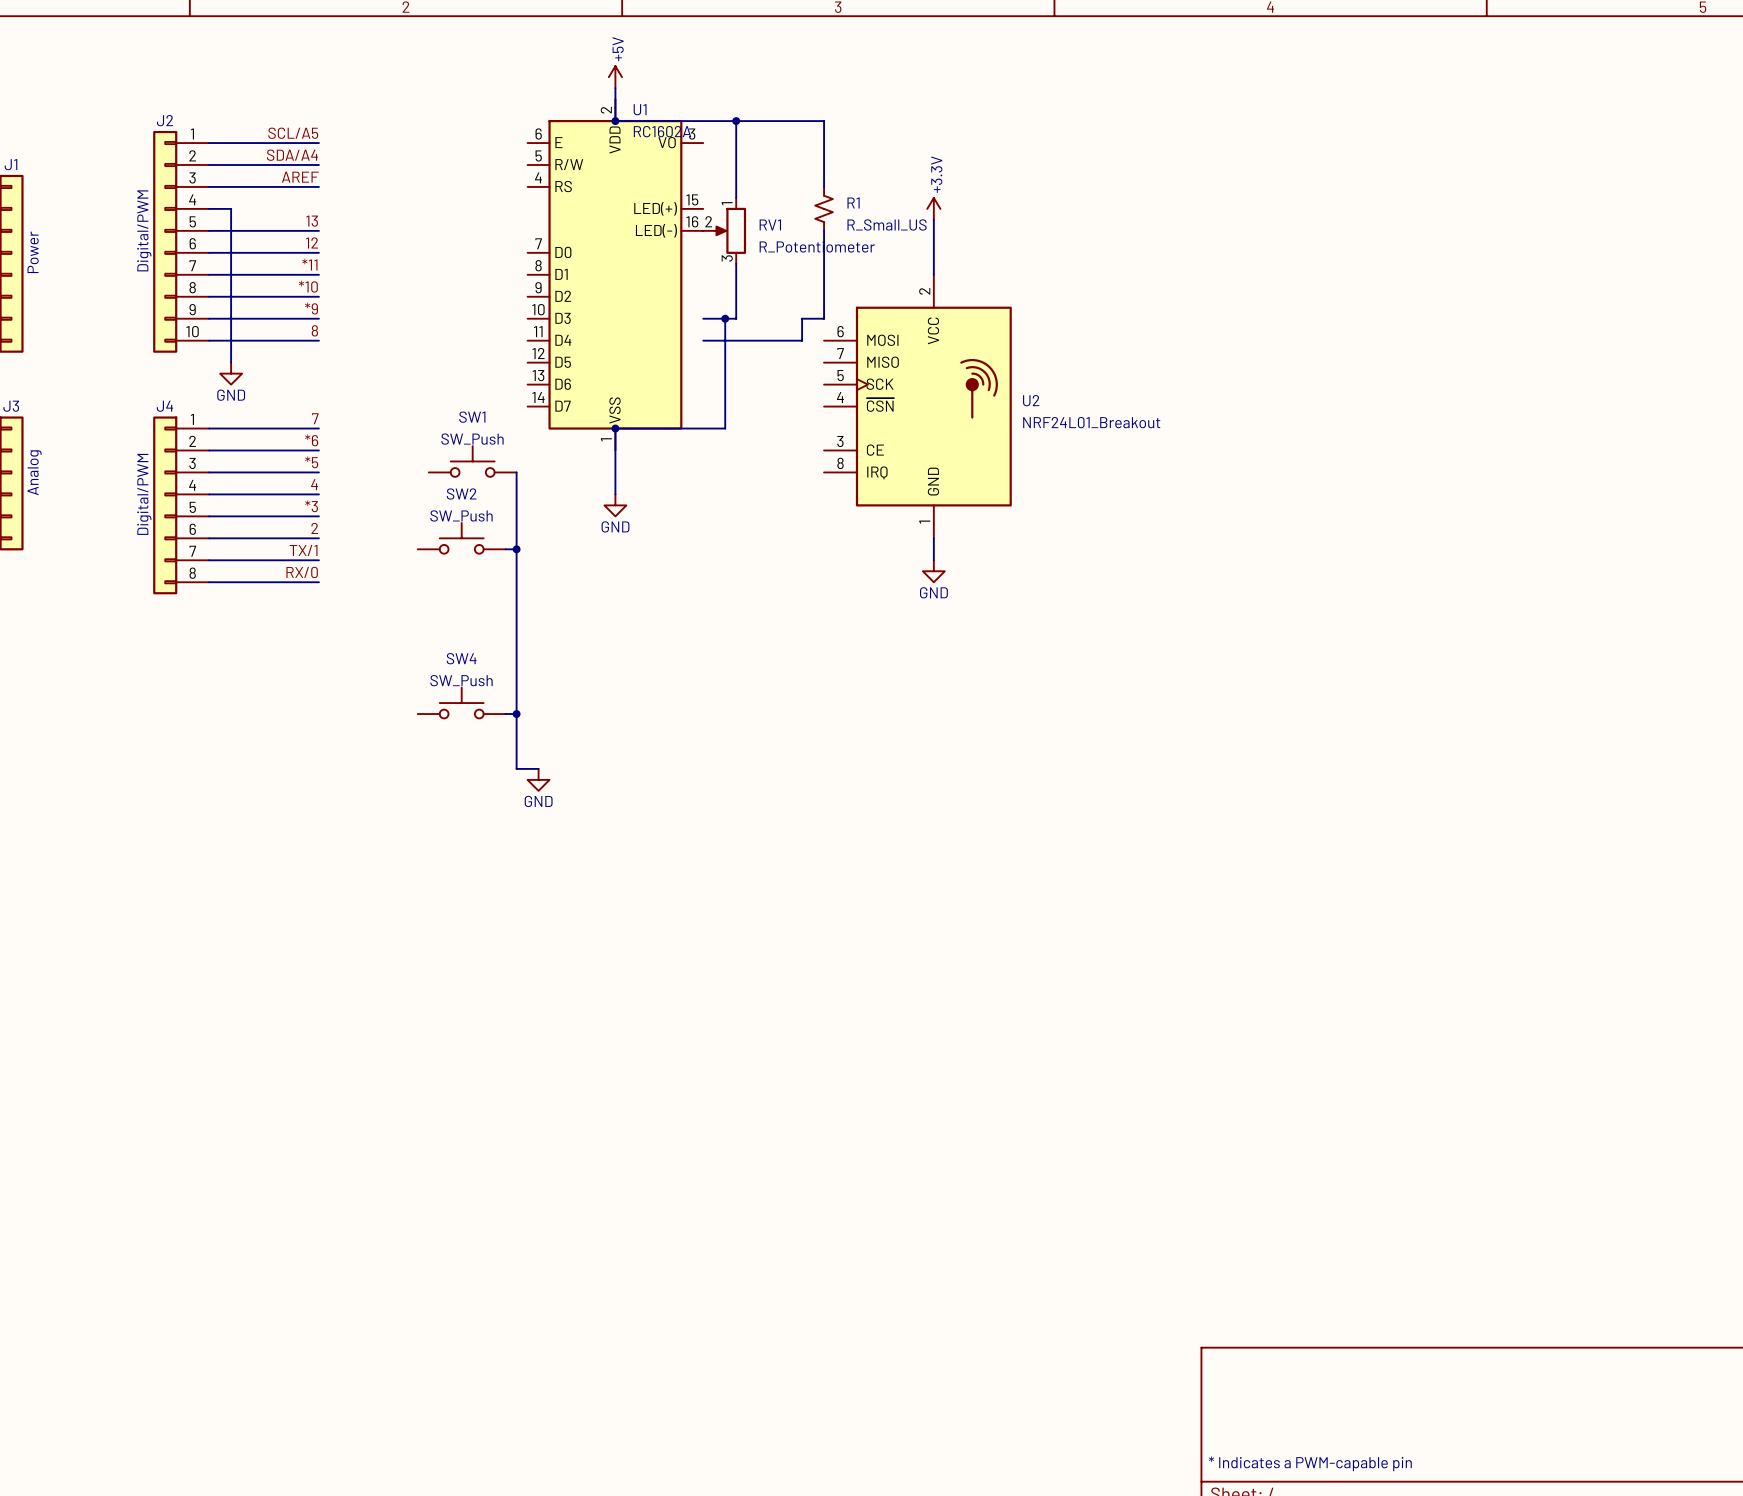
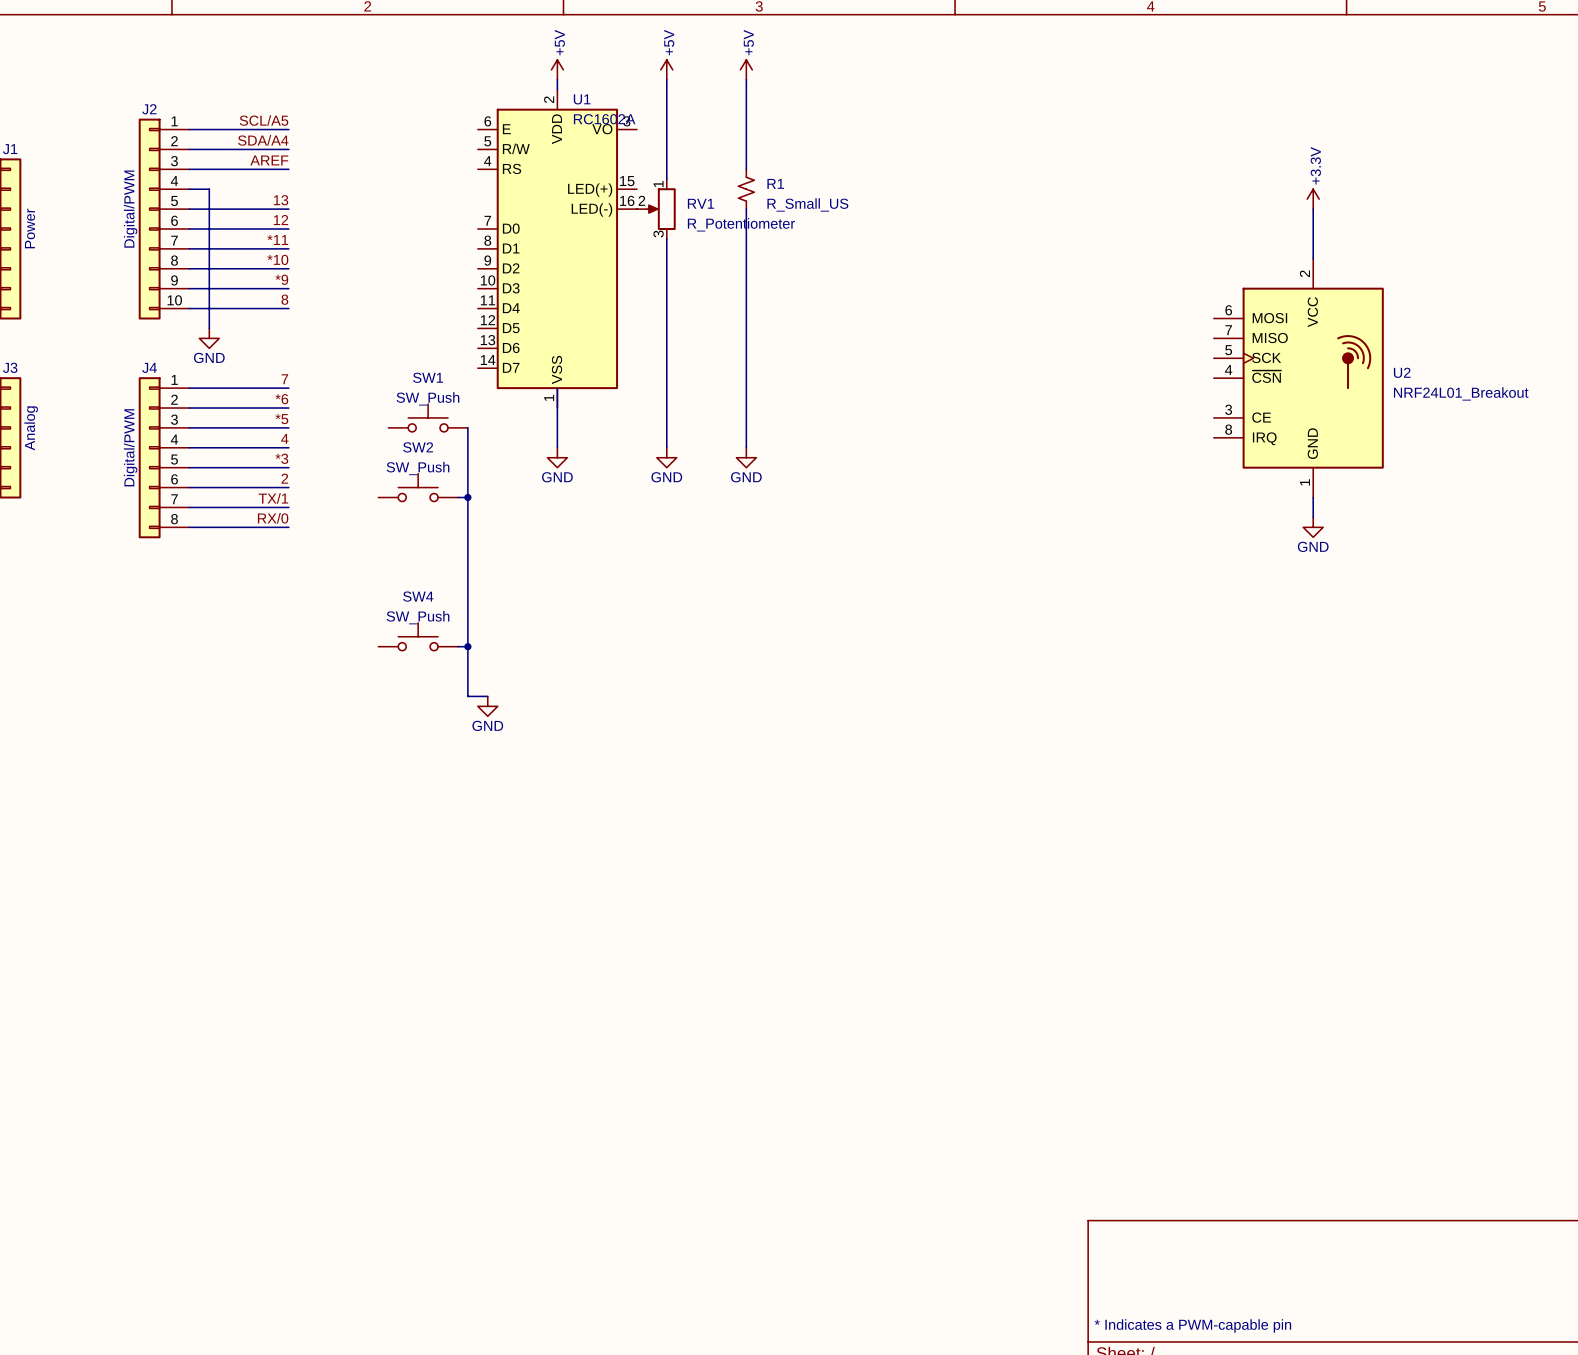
power symbol: none -> +5V (666, 69)
power symbol: none -> +5V (746, 69)
wire: none -> (666, 79) (666, 109)
wire: (615, 99) (615, 121) (824, 121) -> (746, 79) (746, 109)
junction: (615, 121) -> none
junction: (736, 121) -> none
power symbol: +3.3V (933, 208) -> none
wire: (933, 219) (933, 274) -> none
power symbol: none -> +3.3V (1313, 199)
wire: none -> (1313, 209) (1313, 258)
wire: (703, 318) (736, 318) -> (666, 447) (666, 288)
wire: (725, 318) (725, 428) (615, 428) -> none
junction: (725, 318) -> none
wire: (824, 318) (802, 318) (802, 340) (703, 340) -> (746, 288) (746, 447)
U2 position: (917, 406) -> (1298, 378)
junction: (615, 428) -> none
power symbol: none -> GND (666, 457)
power symbol: none -> GND (746, 457)
wire: (933, 538) (933, 560) -> none
wire: none -> (1313, 497) (1313, 517)
power symbol: GND (933, 571) -> none
power symbol: none -> GND (1313, 527)

